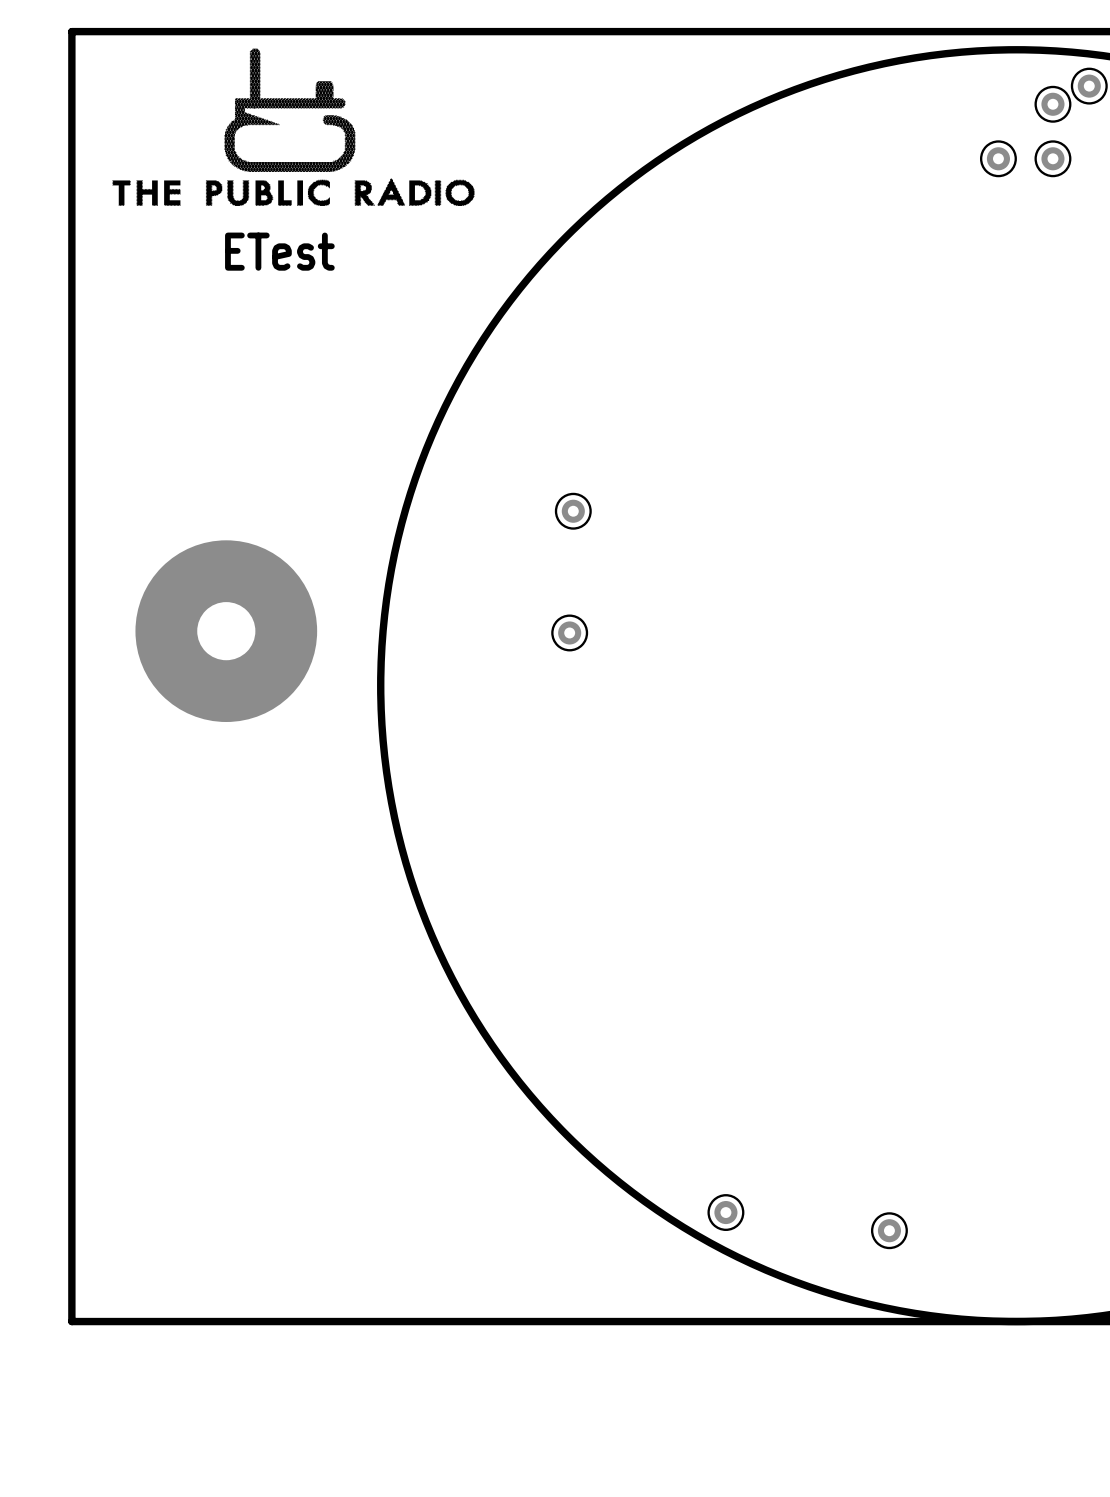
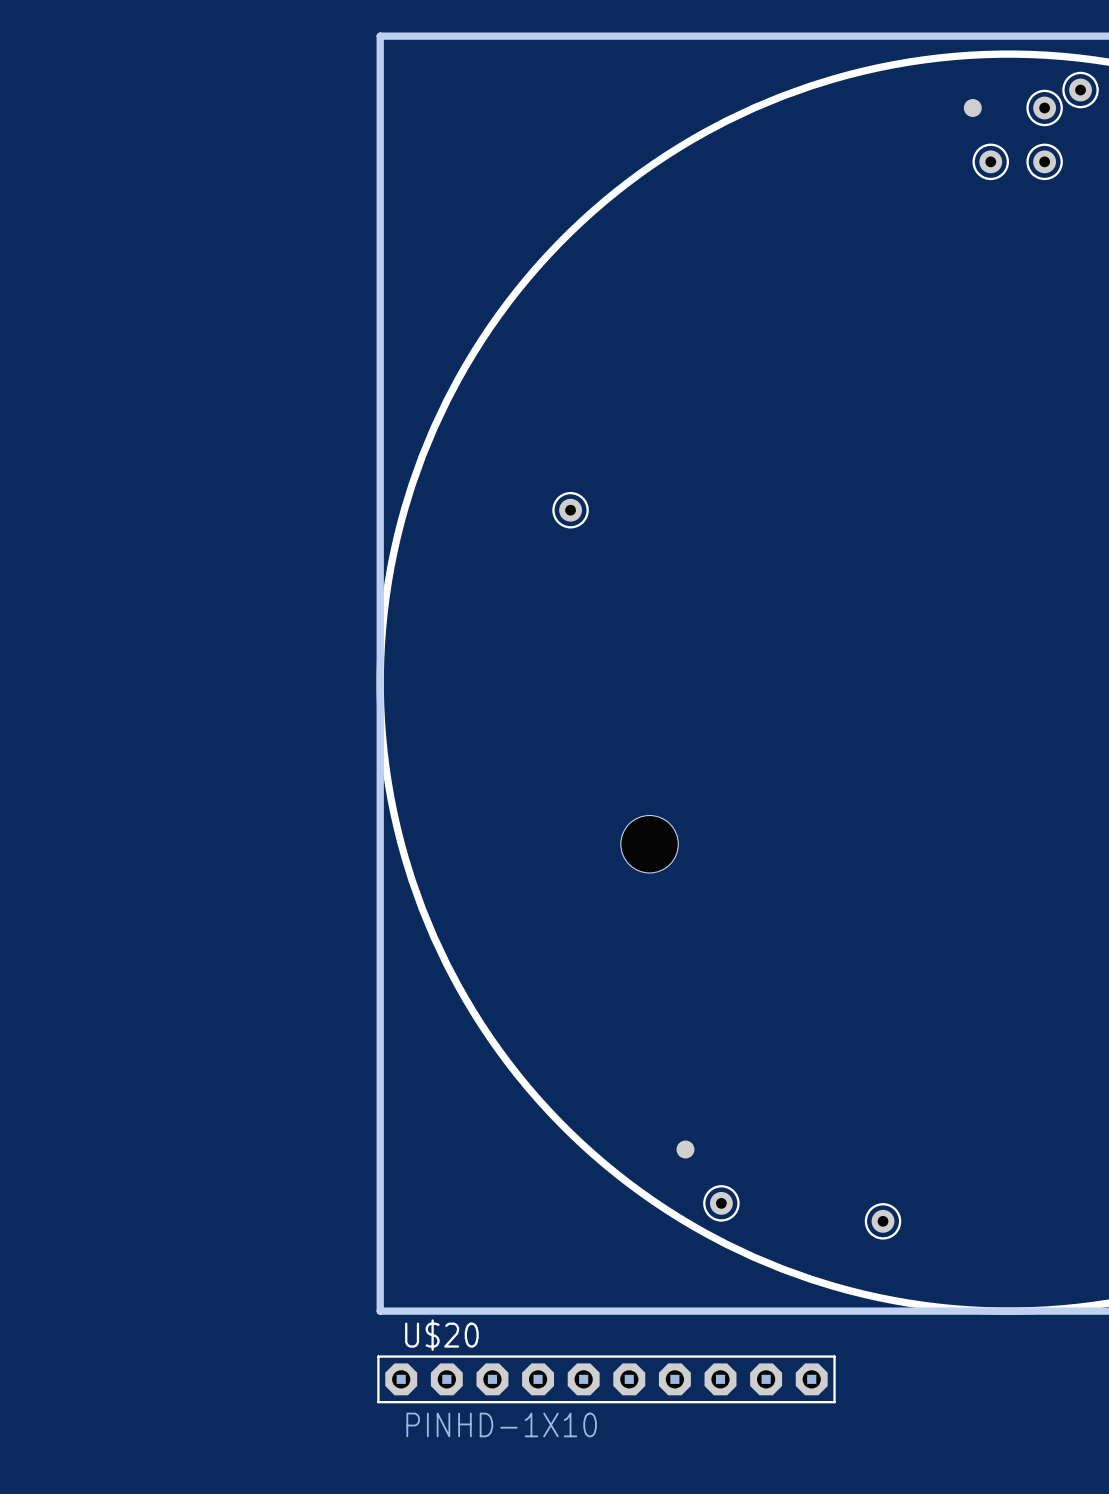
board edge: (380, 31) (71, 31) (71, 1321) (380, 1321) -> (380, 36) (380, 1311)
drawing: [112, 48, 475, 206] -> none
part: none -> (972, 107)
text: ETest (279, 251) -> none
part: (226, 631) -> none
part: (569, 632) -> none
hole: none -> (649, 844)
part: none -> (685, 1149)
U$20: none -> PINHD-1X10 (606, 1379)

